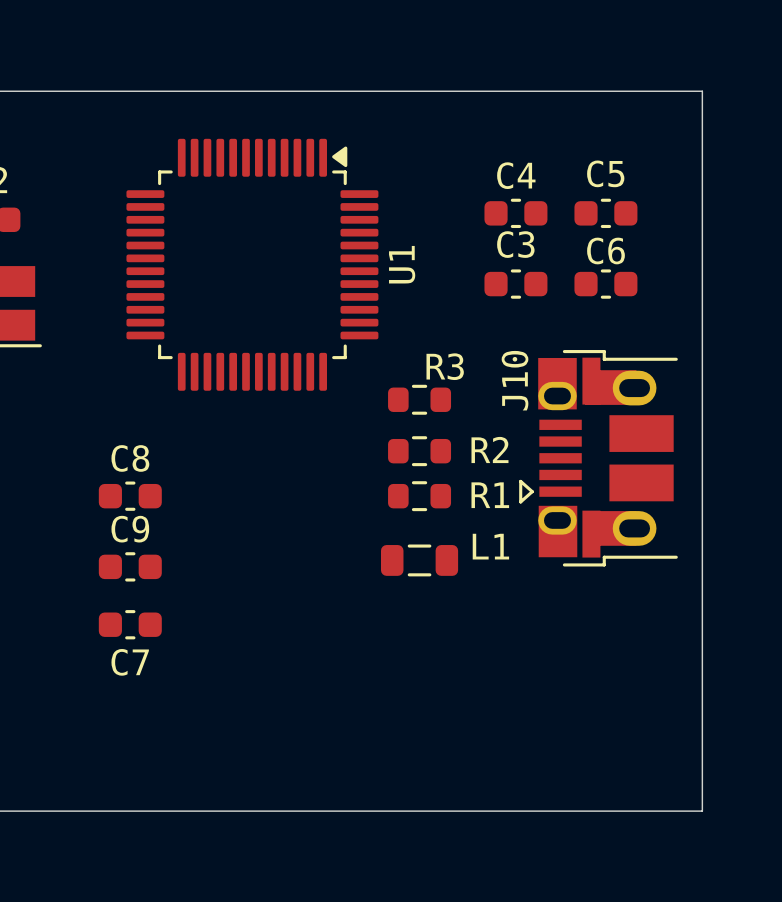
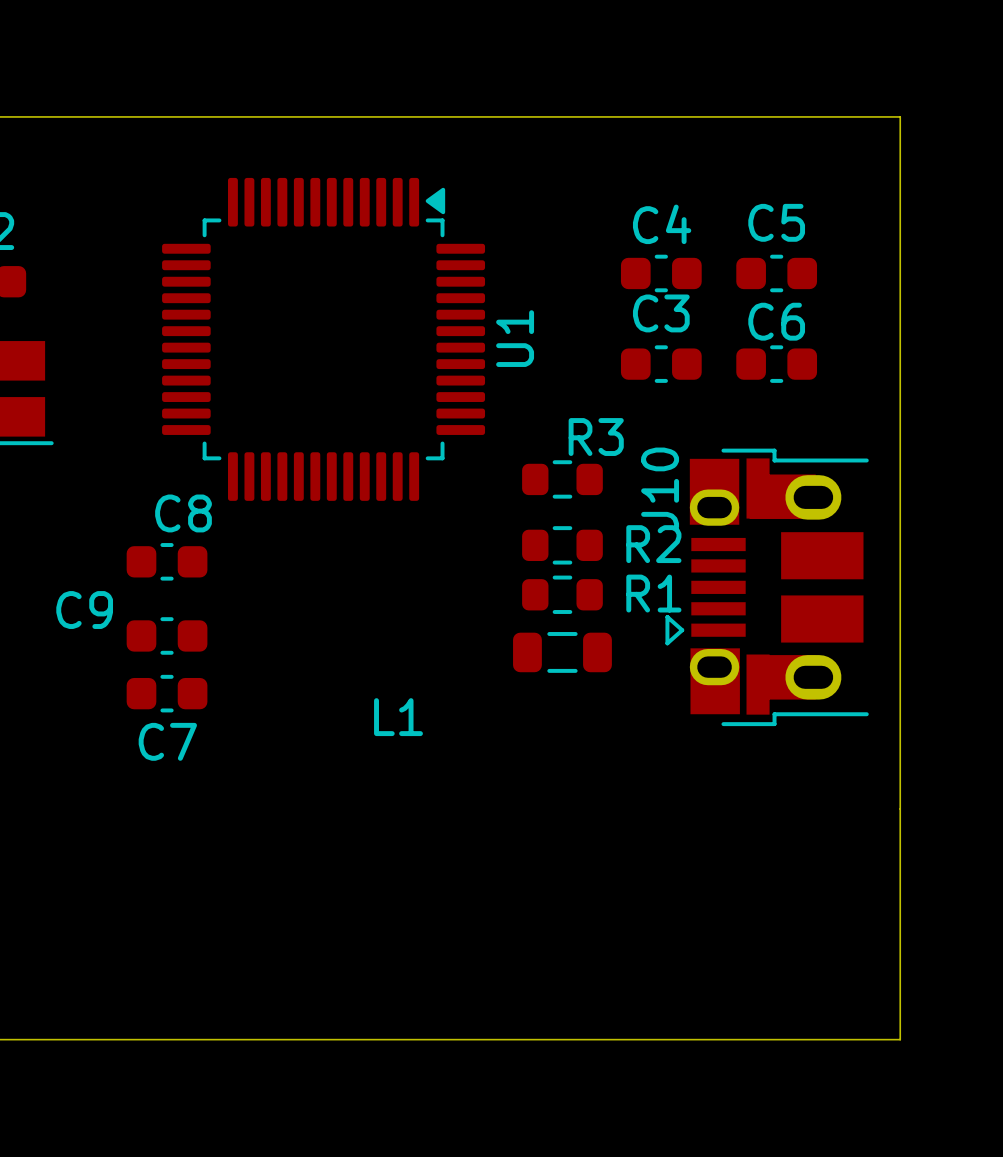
R3 position: (419, 399) -> (562, 479)
C8: none -> (167, 561)
R2 position: (419, 451) -> (562, 545)
C8 name: C8 (130, 458) -> C9 (84, 610)
R1 position: (419, 496) -> (562, 594)
L1 name position: L1 (490, 546) -> L1 (398, 717)
L1 position: (419, 560) -> (562, 652)
C9: (130, 566) -> none
C7 position: (130, 624) -> (167, 693)

